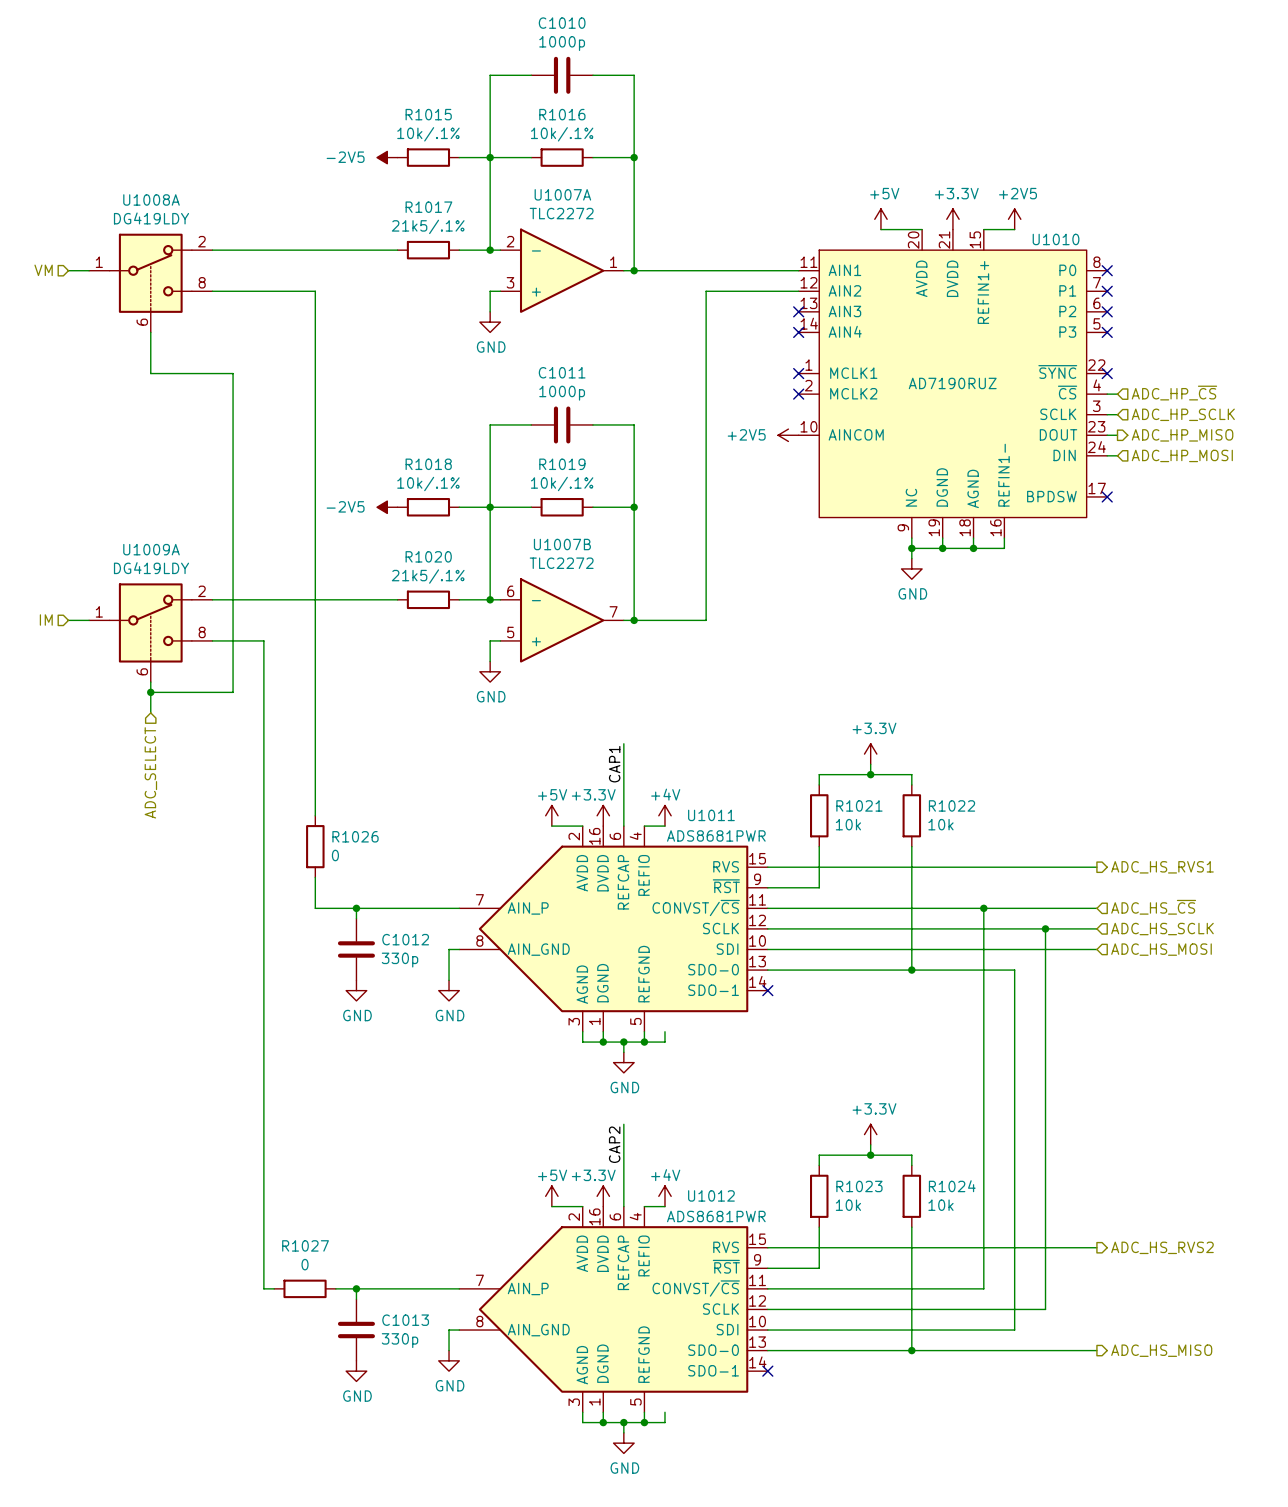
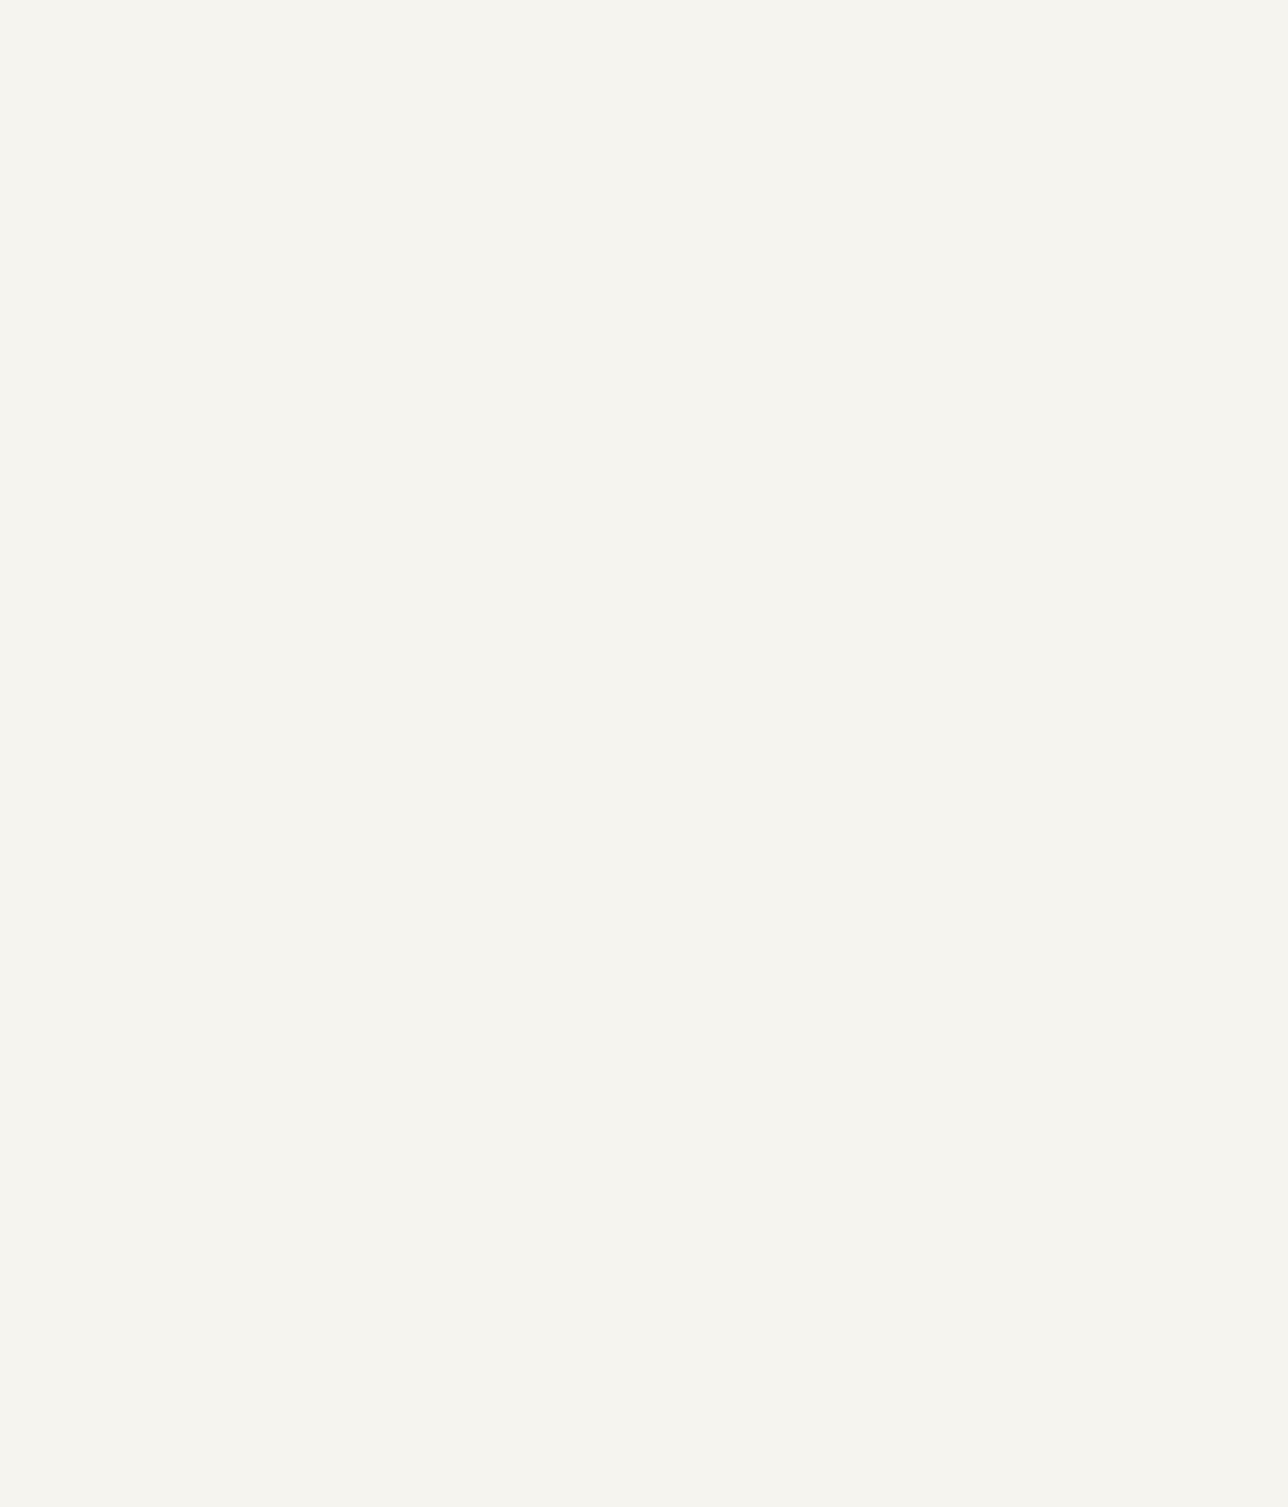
wire: (531, 75) (490, 75) (490, 250) -> none
C1010: 1000p (562, 75) -> none
wire: (592, 75) (634, 75) (634, 270) -> none
power symbol: -2V5 (387, 157) -> none
R1015: 10k/.1% (428, 157) -> none
wire: (459, 157) (531, 157) -> none
junction: (490, 157) -> none
R1016: 10k/.1% (562, 157) -> none
wire: (592, 157) (634, 157) -> none
junction: (634, 157) -> none
power symbol: +5V (880, 219) -> none
power symbol: +3.3V (952, 219) -> none
power symbol: +2V5 (1014, 219) -> none
wire: (880, 229) (922, 229) -> none
wire: (983, 229) (1014, 229) -> none
wire: (212, 250) (397, 250) -> none
R1017: 21k5/.1% (428, 250) -> none
wire: (459, 250) (500, 250) -> none
junction: (490, 250) -> none
hierarchical label: VM (43, 270) -> none
wire: (68, 270) (89, 270) -> none
U1007A: TLC2272 (562, 270) -> none
wire: (623, 270) (798, 270) -> none
junction: (634, 270) -> none
no-connect mark: (1107, 270) -> none
U1008A: DG419LDY (150, 283) -> none
wire: (212, 291) (315, 291) (315, 815) -> none
wire: (500, 291) (490, 291) (490, 311) -> none
wire: (798, 291) (706, 291) (706, 620) (623, 620) -> none
no-connect mark: (1107, 291) -> none
no-connect mark: (798, 311) -> none
no-connect mark: (1107, 311) -> none
power symbol: GND (490, 322) -> none
wire: (150, 332) (150, 373) (233, 373) (233, 692) (150, 692) -> none
no-connect mark: (798, 332) -> none
no-connect mark: (1107, 332) -> none
no-connect mark: (798, 373) -> none
no-connect mark: (1107, 373) -> none
U1010: AD7190RUZ (952, 383) -> none
hierarchical label: ADC_HP_~{CS} (1174, 393) -> none
no-connect mark: (798, 394) -> none
wire: (1107, 394) (1117, 394) -> none
wire: (1107, 414) (1117, 414) -> none
hierarchical label: ADC_HP_SCLK (1183, 414) -> none
wire: (531, 424) (490, 424) (490, 599) -> none
C1011: 1000p (562, 424) -> none
wire: (592, 424) (634, 424) (634, 620) -> none
power symbol: +2V5 (788, 435) -> none
wire: (1107, 435) (1117, 435) -> none
hierarchical label: ADC_HP_MISO (1182, 435) -> none
wire: (1107, 455) (1117, 455) -> none
hierarchical label: ADC_HP_MOSI (1182, 455) -> none
no-connect mark: (1107, 496) -> none
power symbol: -2V5 (387, 507) -> none
R1018: 10k/.1% (428, 507) -> none
wire: (459, 507) (531, 507) -> none
junction: (490, 507) -> none
R1019: 10k/.1% (562, 507) -> none
wire: (592, 507) (634, 507) -> none
junction: (634, 507) -> none
wire: (911, 538) (911, 558) -> none
wire: (942, 538) (942, 548) -> none
wire: (973, 538) (973, 548) -> none
wire: (1004, 538) (1004, 548) (911, 548) -> none
junction: (911, 548) -> none
junction: (942, 548) -> none
junction: (973, 548) -> none
power symbol: GND (911, 568) -> none
wire: (212, 599) (397, 599) -> none
R1020: 21k5/.1% (428, 599) -> none
wire: (459, 599) (500, 599) -> none
junction: (490, 599) -> none
hierarchical label: IM (46, 620) -> none
wire: (68, 620) (89, 620) -> none
U1007B: TLC2272 (562, 620) -> none
junction: (634, 620) -> none
U1009A: DG419LDY (150, 632) -> none
wire: (212, 640) (263, 640) (263, 1288) (274, 1288) -> none
wire: (500, 640) (490, 640) (490, 661) -> none
power symbol: GND (490, 671) -> none
wire: (150, 682) (150, 712) -> none
junction: (150, 692) -> none
wire: (623, 743) (623, 826) -> none
power symbol: +3.3V (870, 754) -> none
label: CAP1 (614, 764) -> none
wire: (870, 764) (870, 774) -> none
hierarchical label: ADC_SELECT (150, 772) -> none
junction: (870, 774) -> none
wire: (819, 784) (819, 774) (911, 774) (911, 784) -> none
power symbol: +5V (551, 815) -> none
power symbol: +3.3V (603, 815) -> none
power symbol: +4V (664, 815) -> none
R1021: 10k (819, 815) -> none
R1022: 10k (911, 815) -> none
wire: (551, 826) (582, 826) -> none
wire: (644, 826) (664, 826) -> none
R1026: 0 (315, 846) -> none
wire: (819, 846) (819, 887) (767, 887) -> none
wire: (911, 846) (911, 970) -> none
wire: (767, 867) (1096, 867) -> none
hierarchical label: ADC_HS_RVS1 (1162, 867) -> none
wire: (315, 877) (315, 908) (459, 908) -> none
hierarchical label: ADC_HS_~{CS} (1153, 907) -> none
wire: (356, 908) (356, 918) -> none
junction: (356, 908) -> none
wire: (767, 908) (1096, 908) -> none
wire: (983, 908) (983, 1288) (767, 1288) -> none
junction: (983, 908) -> none
U1011: ADS8681PWR (613, 928) -> none
wire: (767, 928) (1096, 928) -> none
wire: (1045, 928) (1045, 1309) (767, 1309) -> none
junction: (1045, 928) -> none
hierarchical label: ADC_HS_SCLK (1162, 929) -> none
C1012: 330p (356, 949) -> none
wire: (459, 949) (449, 949) (449, 980) -> none
wire: (767, 949) (1096, 949) -> none
hierarchical label: ADC_HS_MOSI (1161, 949) -> none
wire: (767, 970) (1014, 970) (1014, 1330) (767, 1330) -> none
junction: (911, 970) -> none
power symbol: GND (356, 990) -> none
power symbol: GND (449, 990) -> none
no-connect mark: (767, 990) -> none
wire: (582, 1031) (582, 1042) (664, 1042) (664, 1031) -> none
wire: (603, 1031) (603, 1042) -> none
wire: (644, 1031) (644, 1042) -> none
junction: (603, 1042) -> none
wire: (623, 1042) (623, 1052) -> none
junction: (623, 1042) -> none
junction: (644, 1042) -> none
power symbol: GND (623, 1062) -> none
wire: (623, 1124) (623, 1206) -> none
power symbol: +3.3V (870, 1134) -> none
label: CAP2 (614, 1144) -> none
wire: (870, 1144) (870, 1155) -> none
junction: (870, 1155) -> none
wire: (819, 1165) (819, 1155) (911, 1155) (911, 1165) -> none
power symbol: +5V (551, 1196) -> none
power symbol: +3.3V (603, 1196) -> none
power symbol: +4V (664, 1196) -> none
R1023: 10k (819, 1196) -> none
R1024: 10k (911, 1196) -> none
wire: (551, 1206) (582, 1206) -> none
wire: (644, 1206) (664, 1206) -> none
wire: (819, 1227) (819, 1268) (767, 1268) -> none
wire: (911, 1227) (911, 1350) -> none
wire: (767, 1247) (1096, 1247) -> none
hierarchical label: ADC_HS_RVS2 (1162, 1247) -> none
R1027: 0 (305, 1288) -> none
wire: (335, 1288) (459, 1288) -> none
wire: (356, 1288) (356, 1299) -> none
junction: (356, 1288) -> none
U1012: ADS8681PWR (613, 1309) -> none
C1013: 330p (356, 1330) -> none
wire: (459, 1330) (449, 1330) (449, 1350) -> none
wire: (767, 1350) (1096, 1350) -> none
junction: (911, 1350) -> none
hierarchical label: ADC_HS_MISO (1161, 1350) -> none
power symbol: GND (449, 1360) -> none
power symbol: GND (356, 1371) -> none
no-connect mark: (767, 1371) -> none
wire: (582, 1412) (582, 1422) (664, 1422) (664, 1412) -> none
wire: (603, 1412) (603, 1422) -> none
wire: (644, 1412) (644, 1422) -> none
junction: (603, 1422) -> none
wire: (623, 1422) (623, 1432) -> none
junction: (623, 1422) -> none
junction: (644, 1422) -> none
power symbol: GND (623, 1443) -> none

